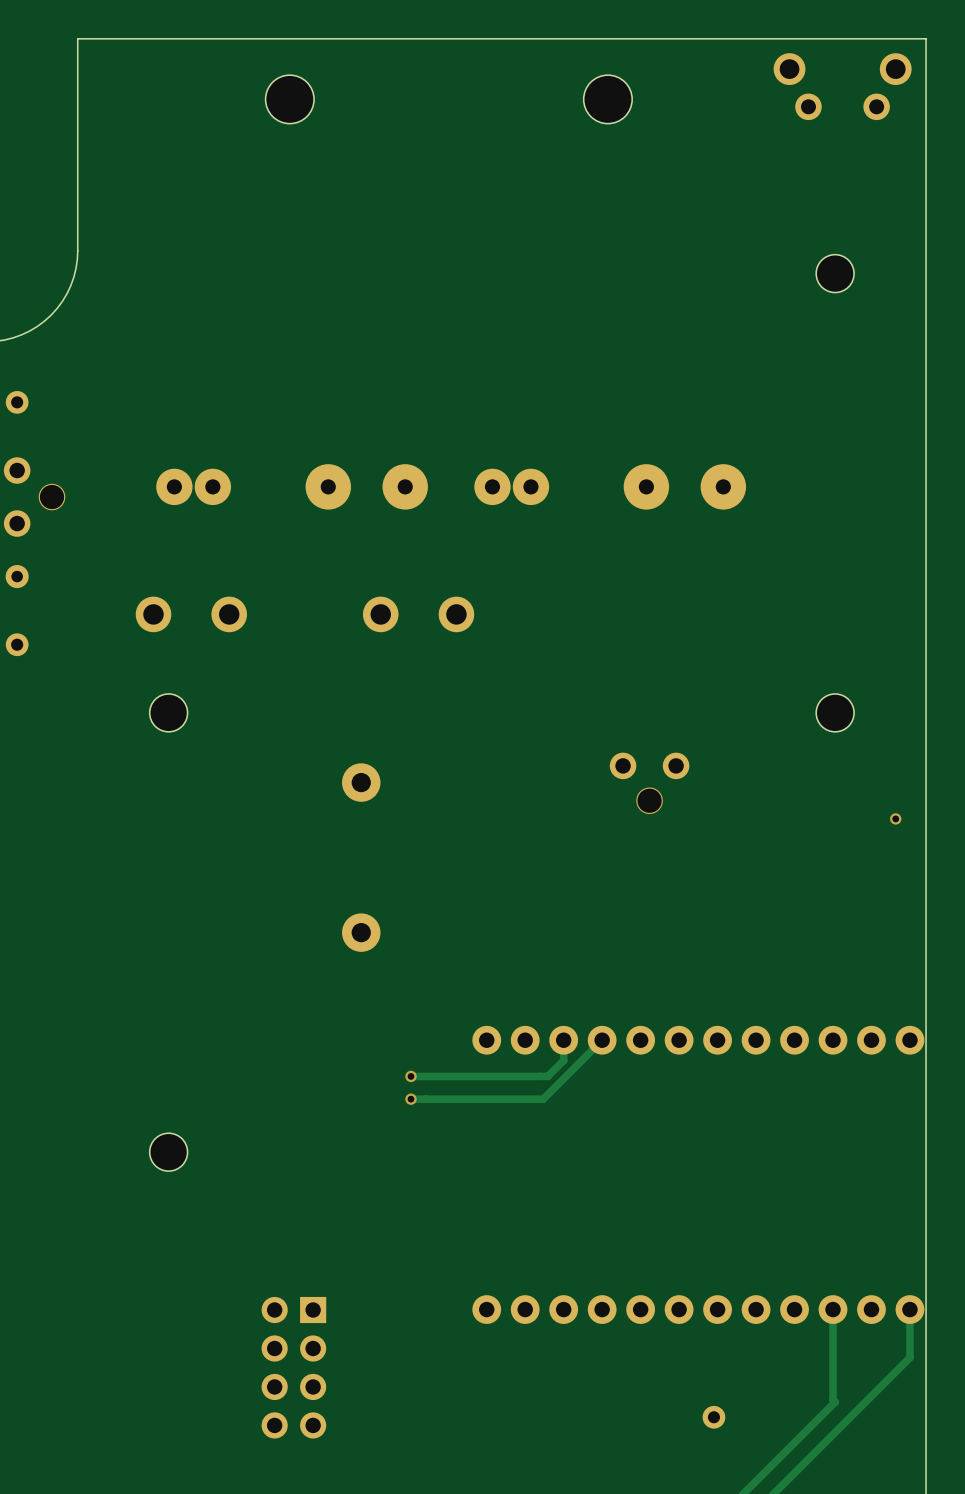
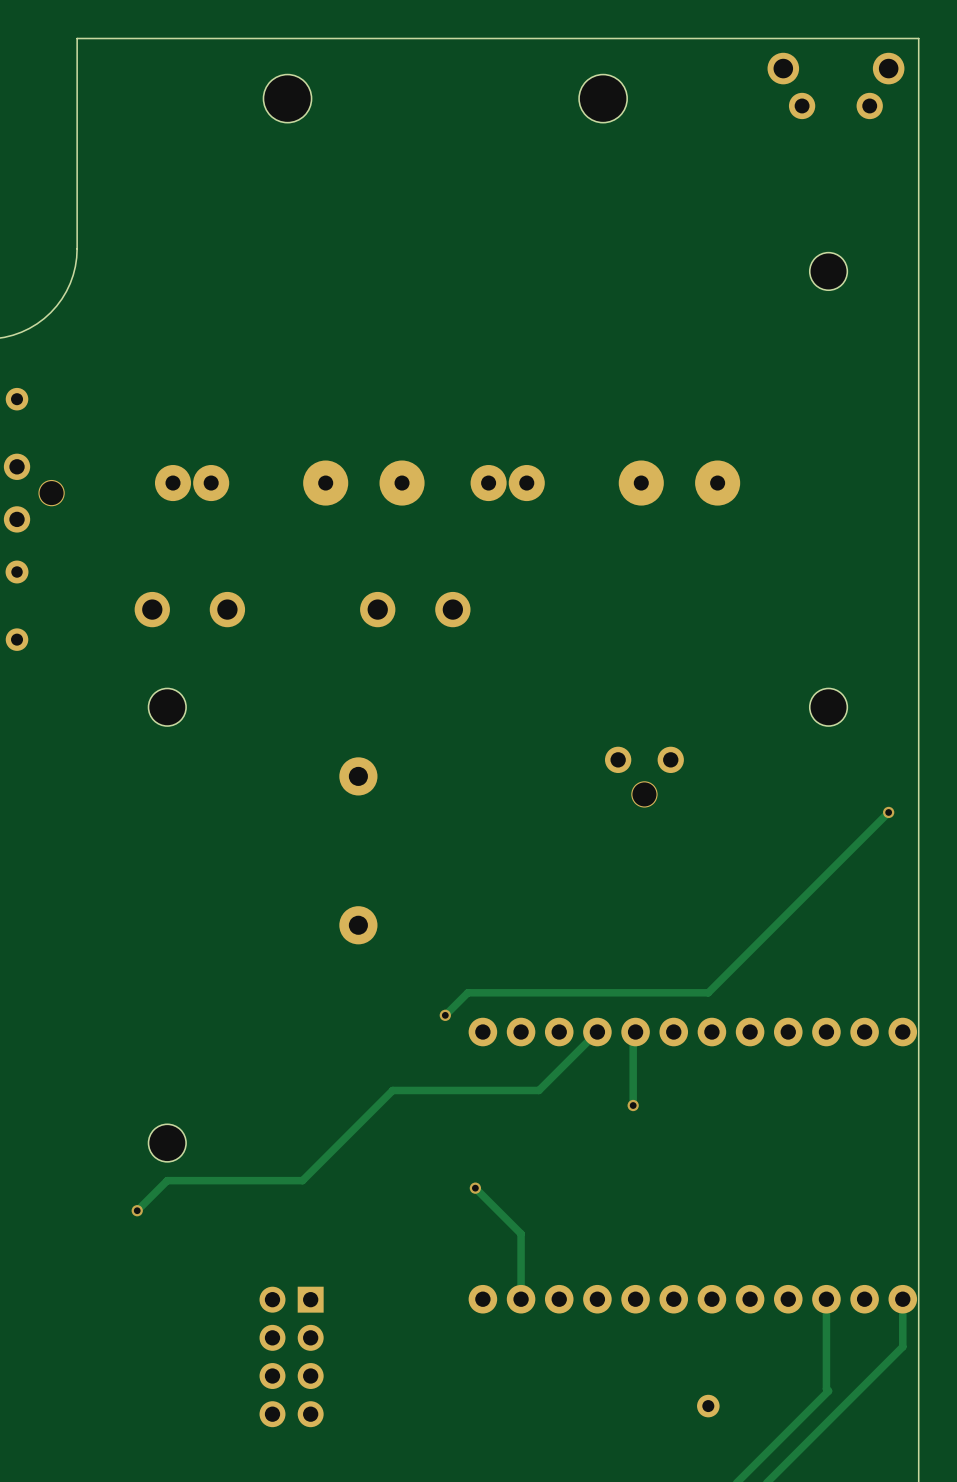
track: none -> (888, 812) (708, 992) (467, 992) (445, 1015)
via: none -> (445, 1015)
track: (563, 1040) (563, 1060) (547, 1076) (411, 1076) -> none
track: none -> (633, 1034) (633, 1105)
via: (411, 1076) -> none
track: none -> (407, 1090) (392, 1090) (302, 1180) (167, 1180) (137, 1210)
via: (411, 1099) -> none
via: none -> (633, 1105)
track: none -> (475, 1188) (521, 1233) (521, 1299)
via: none -> (475, 1188)
via: none -> (137, 1210)

